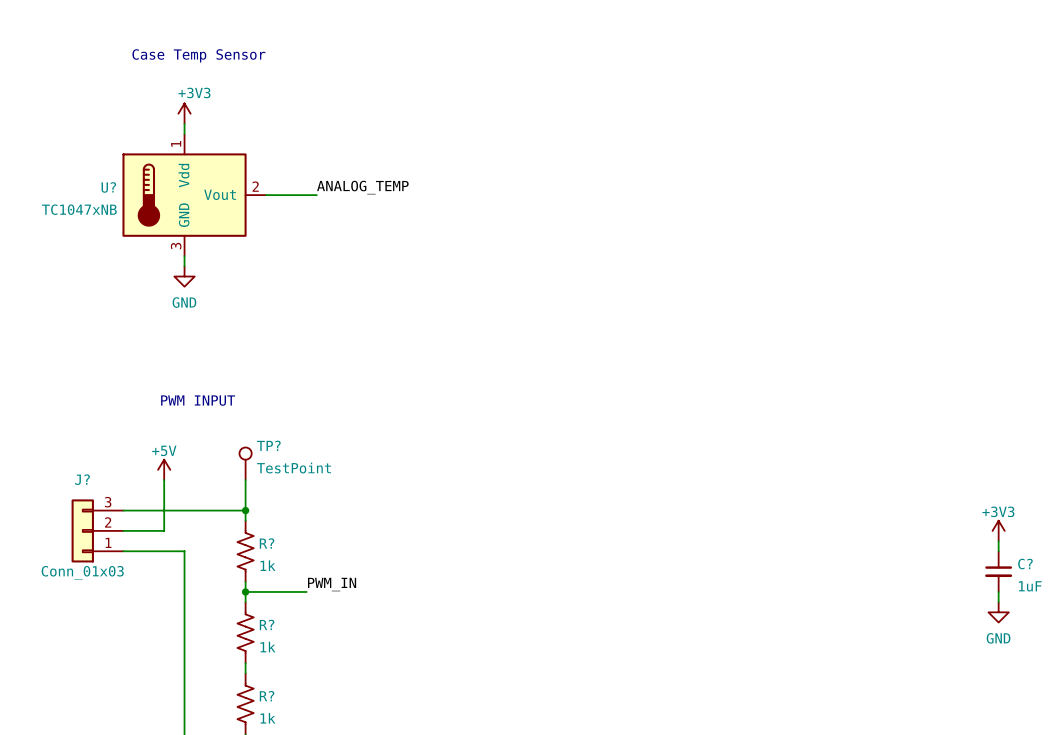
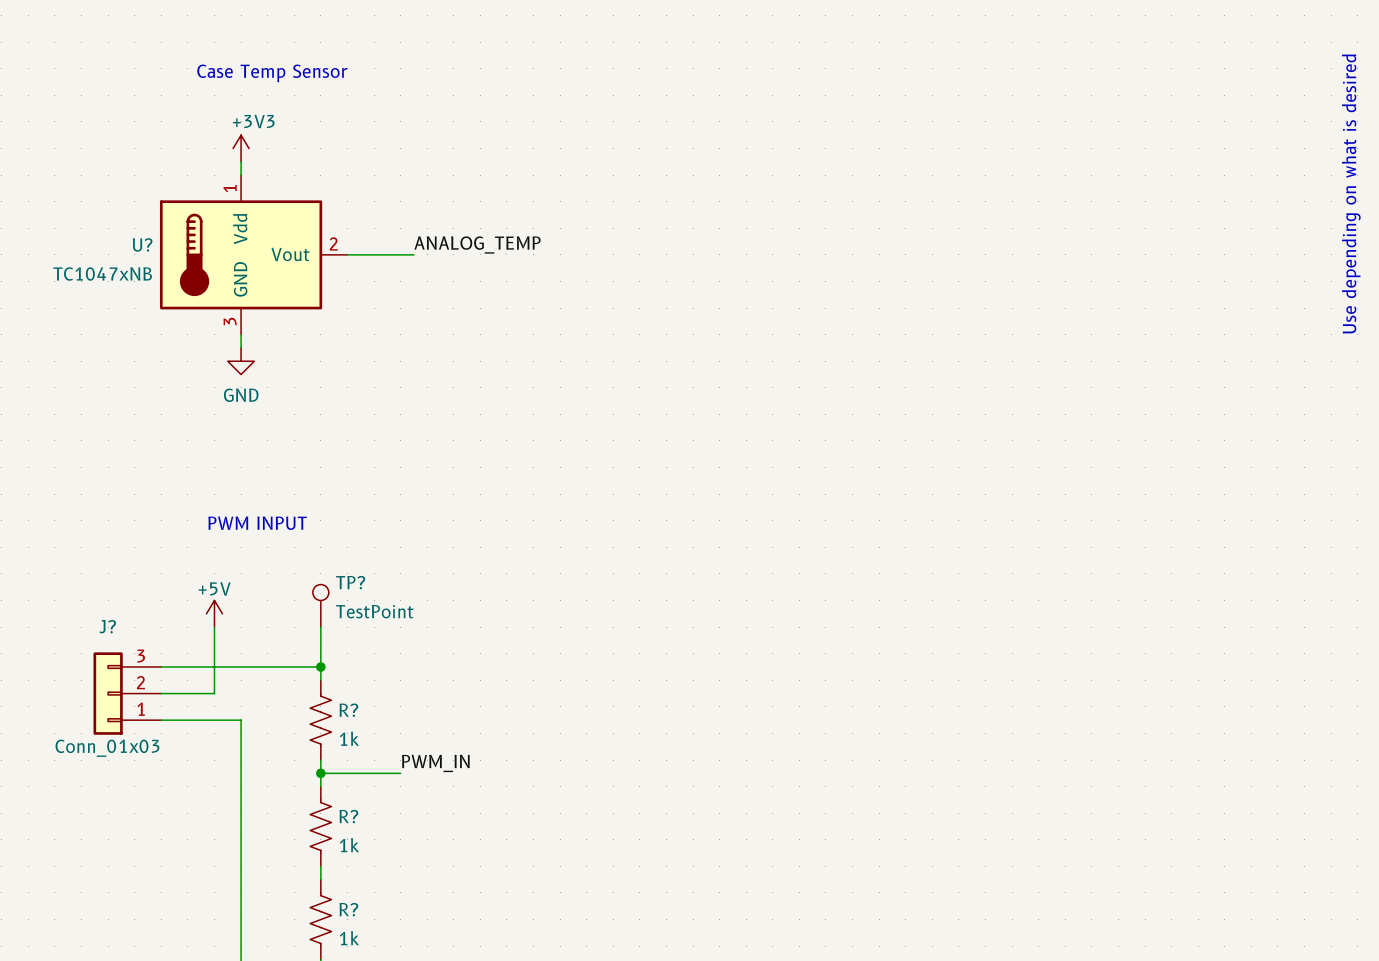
text: none -> Use depending on what is desired (1351, 194)
power symbol: +3V3 (998, 530) -> none
wire: (998, 541) (998, 551) -> none
C?: 1uF (998, 571) -> none
wire: (998, 591) (998, 602) -> none
power symbol: GND (998, 612) -> none

